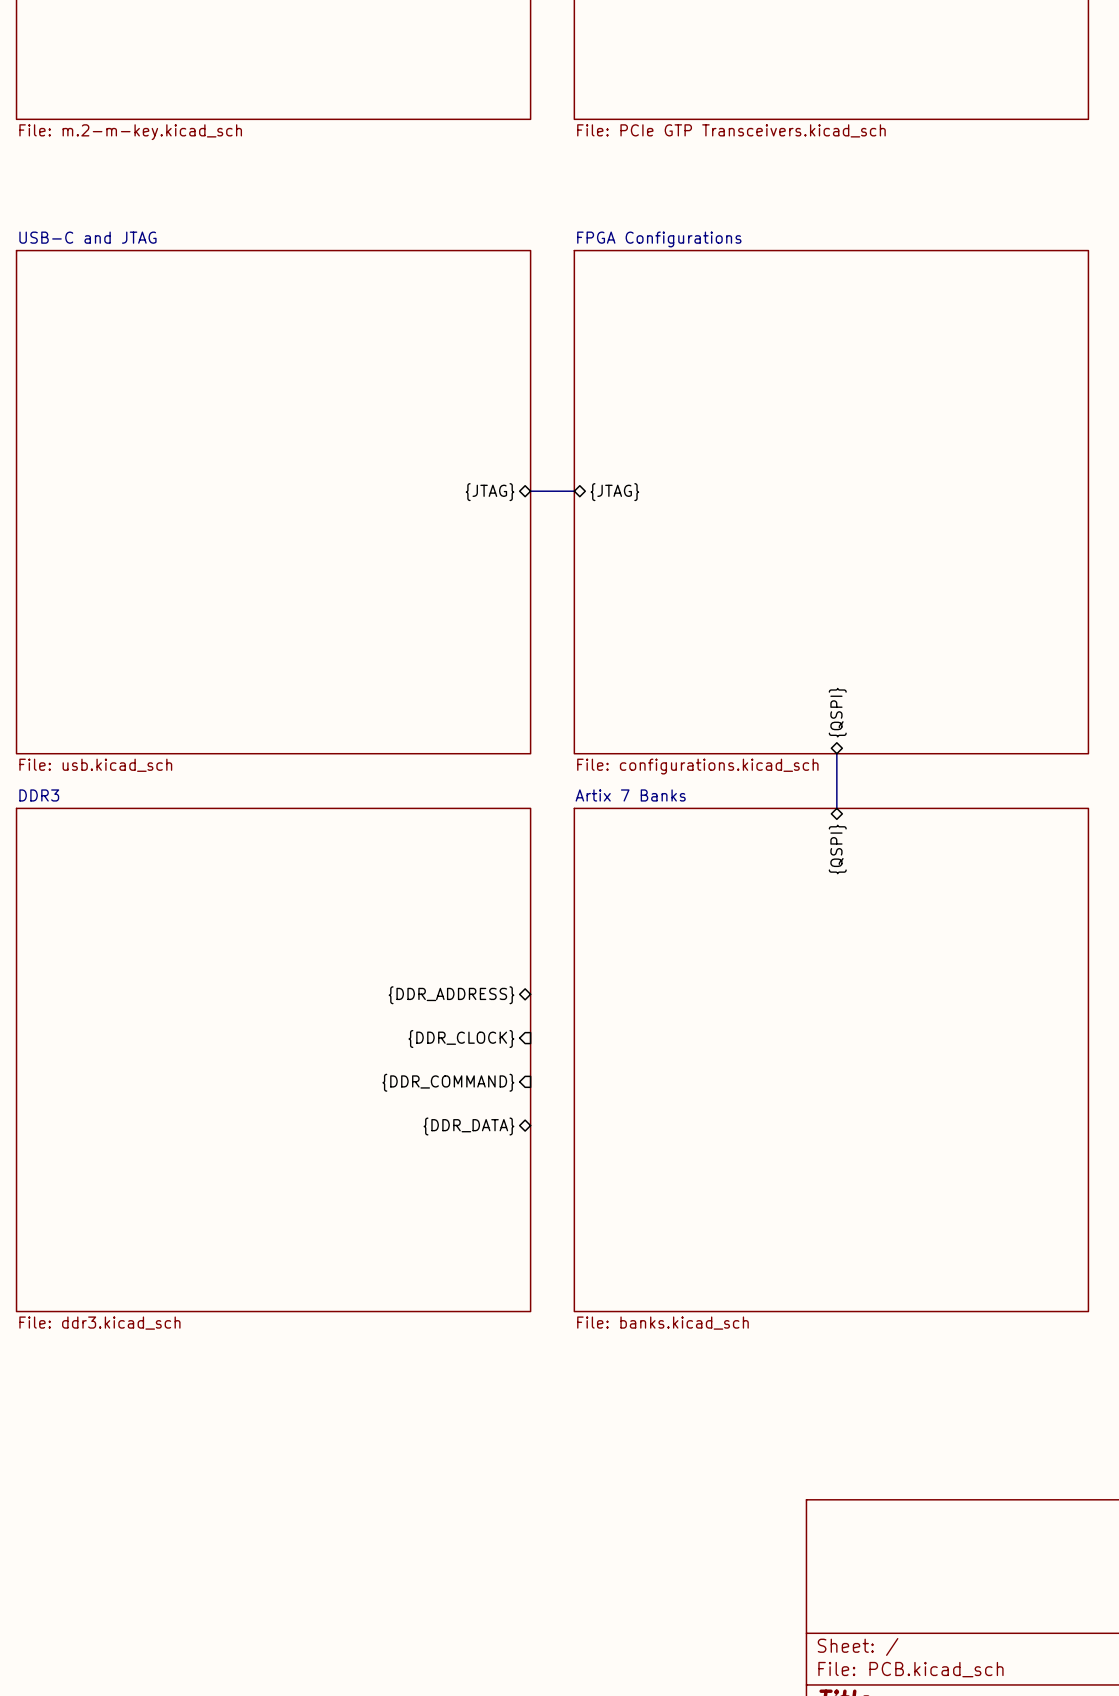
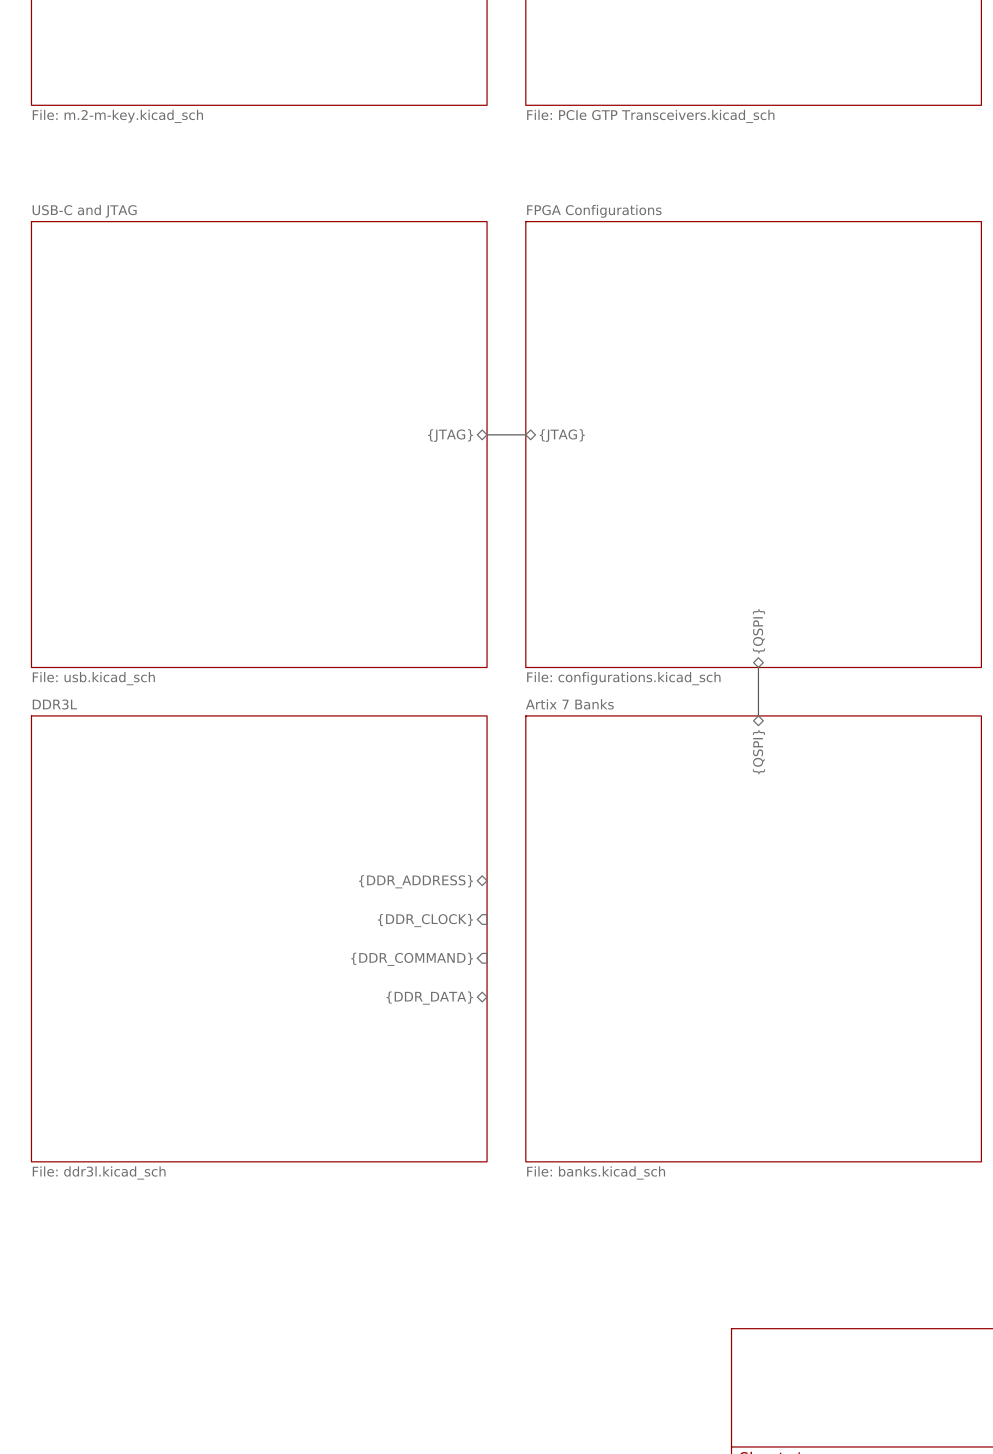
sheet DDR3 name: DDR3 (39, 795) -> DDR3L (54, 704)
sheet DDR3 value: File: ddr3.kicad_sch (99, 1323) -> File: ddr3l.kicad_sch (99, 1172)

